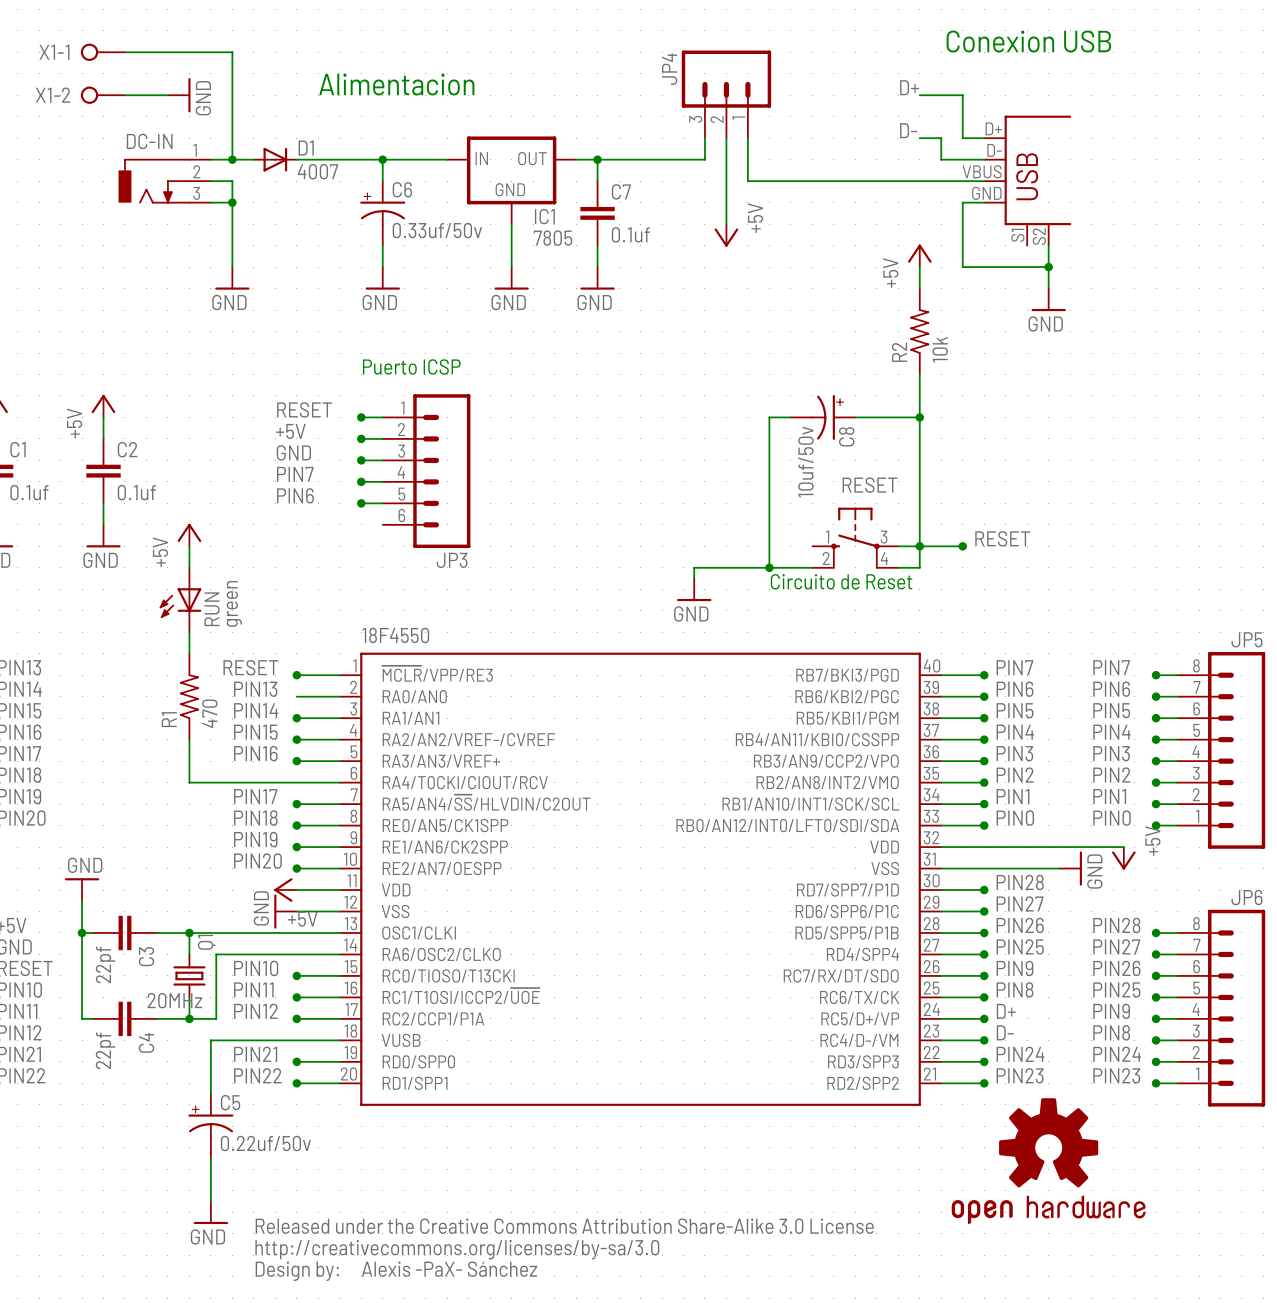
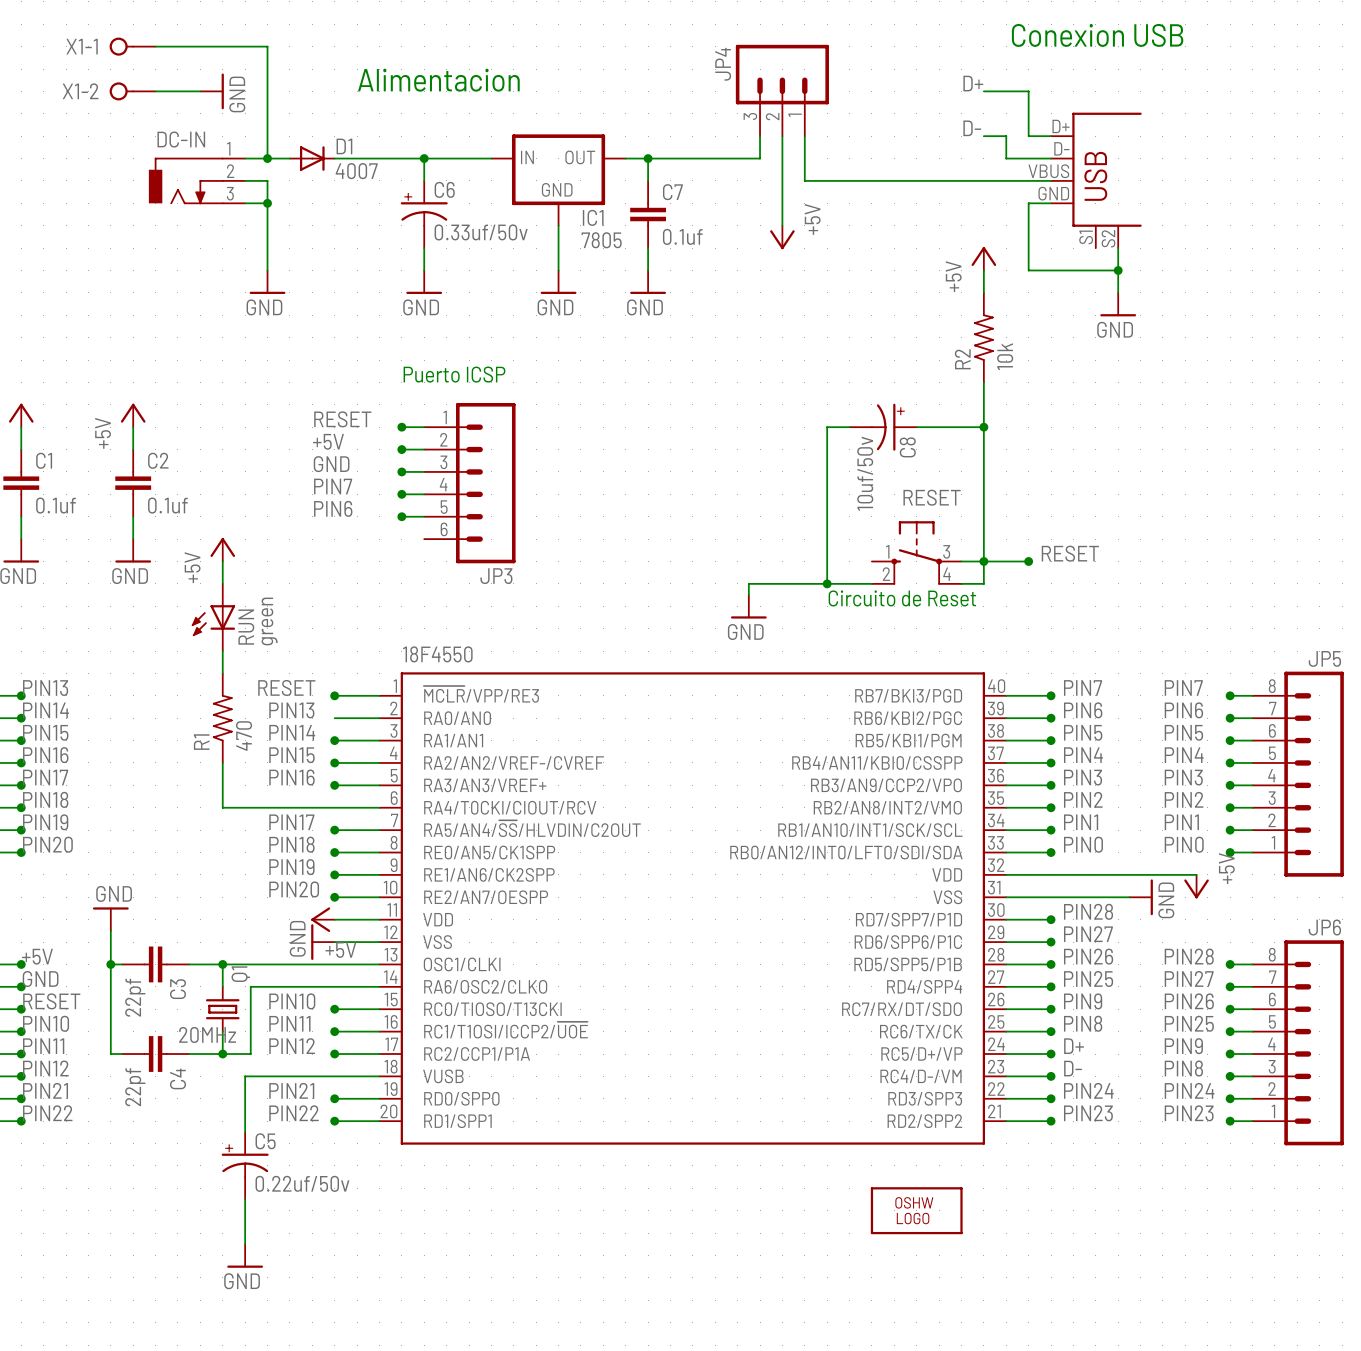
part: (1048, 1161) -> none
part: none -> (916, 1210)
part: (564, 1249) -> none
text: Alexis -PaX- Sánchez (449, 1269) -> none

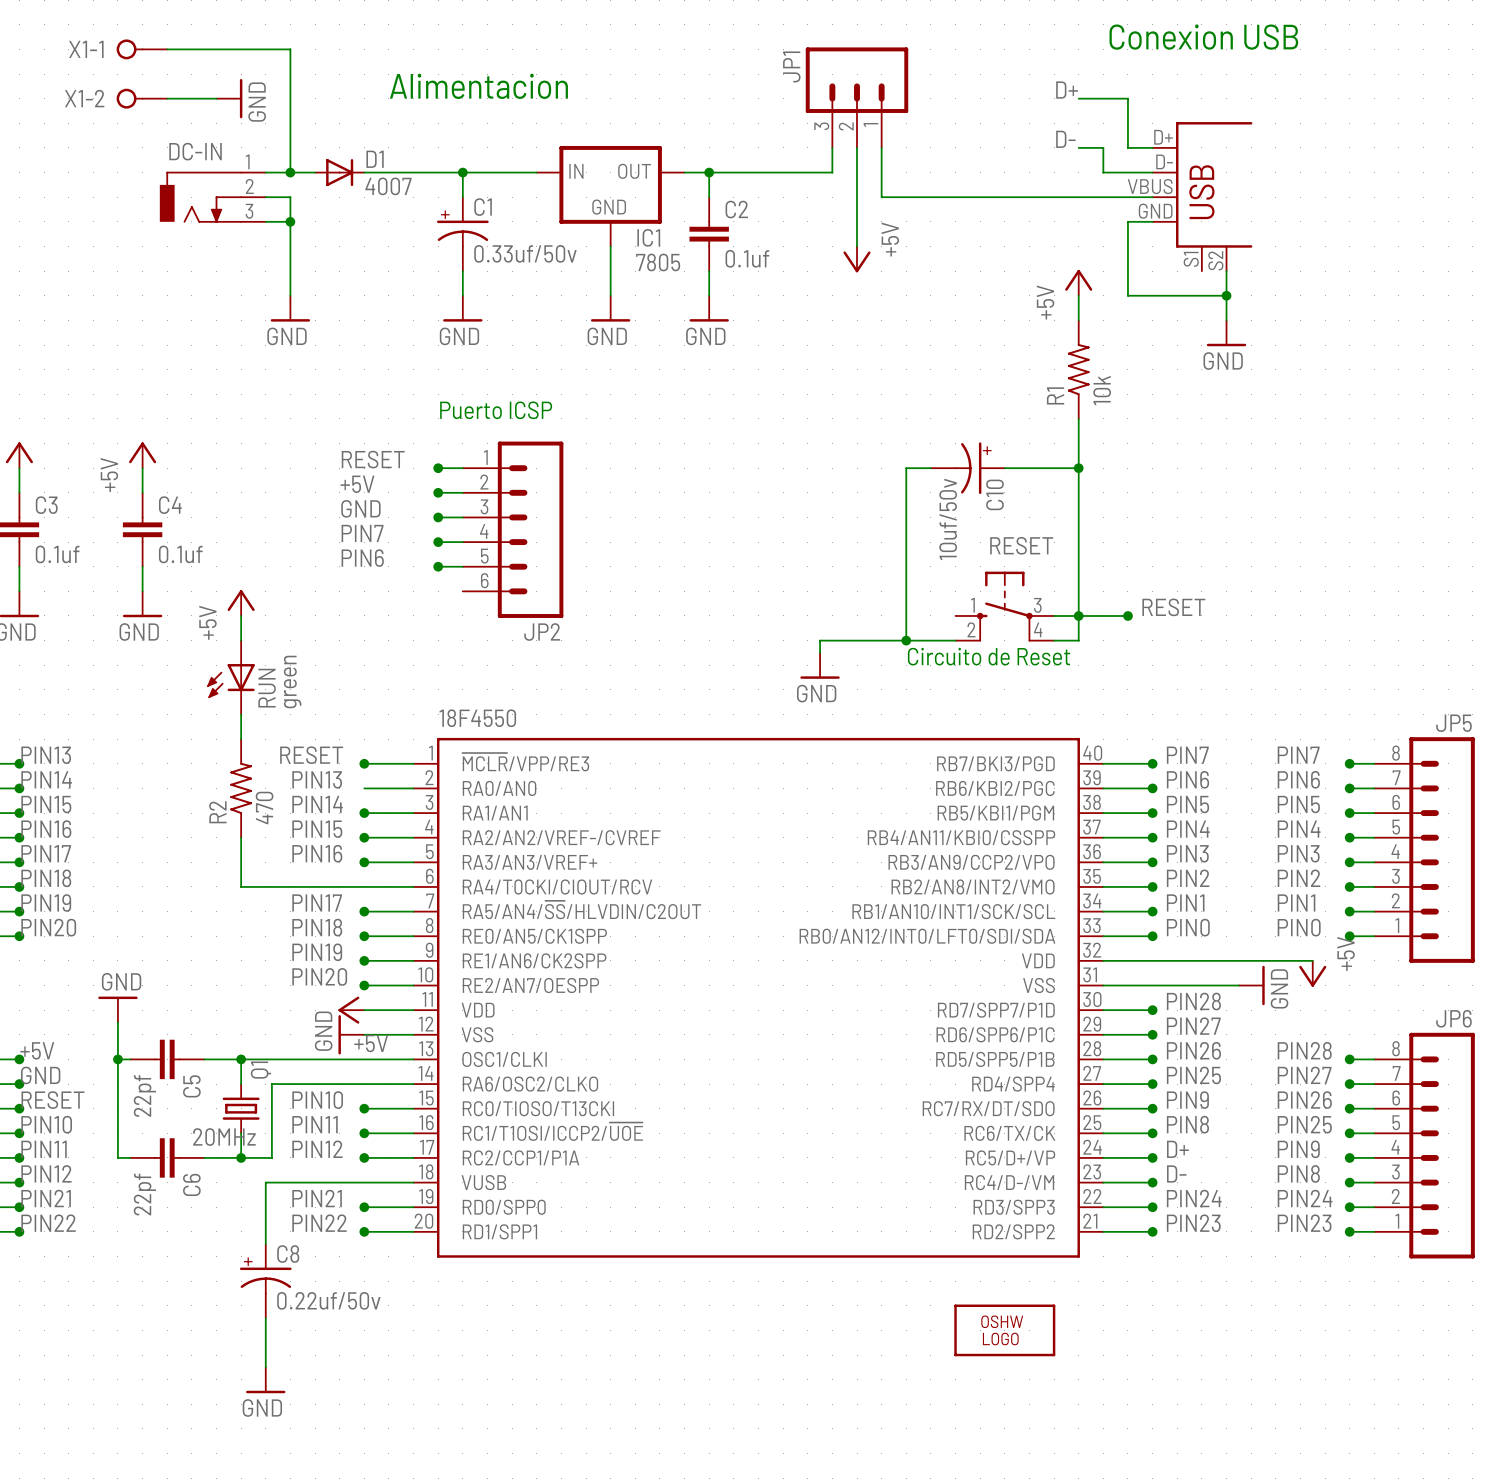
JP4 name: JP4 (723, 64) -> JP1 (791, 66)
C6 name: C6 (444, 189) -> C1 (483, 207)
C7 name: C7 (672, 192) -> C2 (736, 209)
R2 name: R2 (962, 359) -> R1 (1055, 395)
C8 name: C8 (907, 447) -> C10 (994, 494)
C1 name: C1 (44, 460) -> C3 (46, 505)
C2 name: C2 (158, 460) -> C4 (170, 505)
JP3 name: JP3 (496, 576) -> JP2 (542, 632)
R1 name: R1 (201, 742) -> R2 (217, 812)
C3 name: C3 (177, 989) -> C5 (191, 1086)
C4 name: C4 (177, 1078) -> C6 (191, 1184)
C5 name: C5 (265, 1141) -> C8 (288, 1254)

